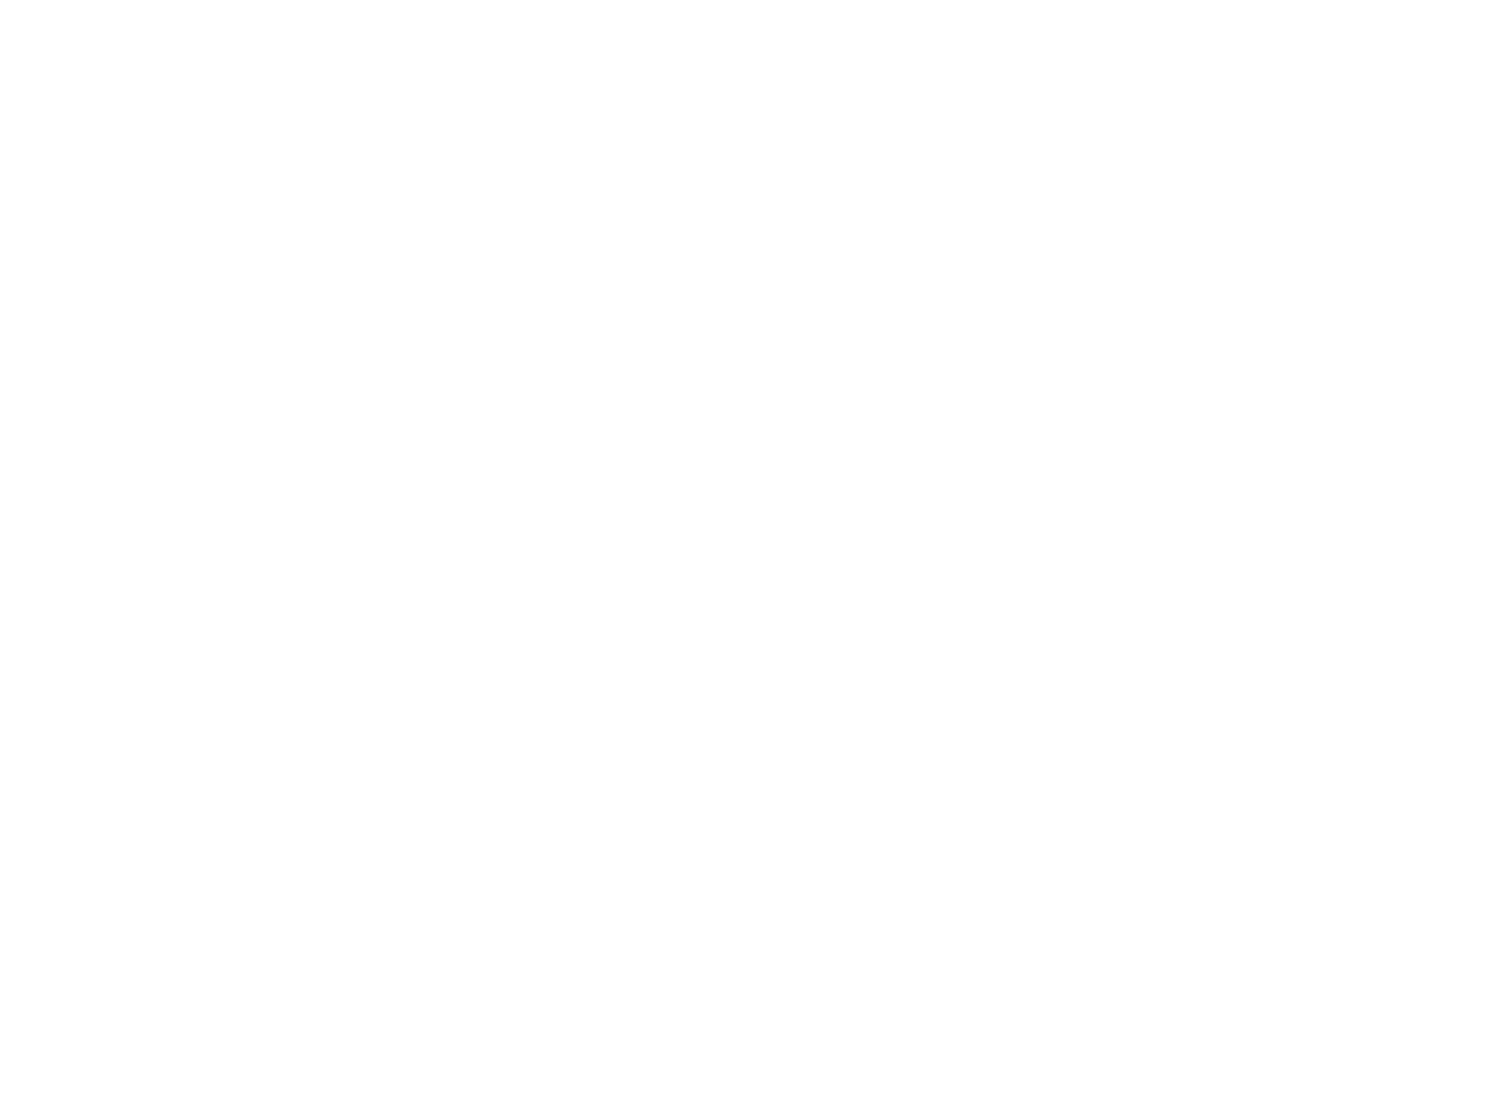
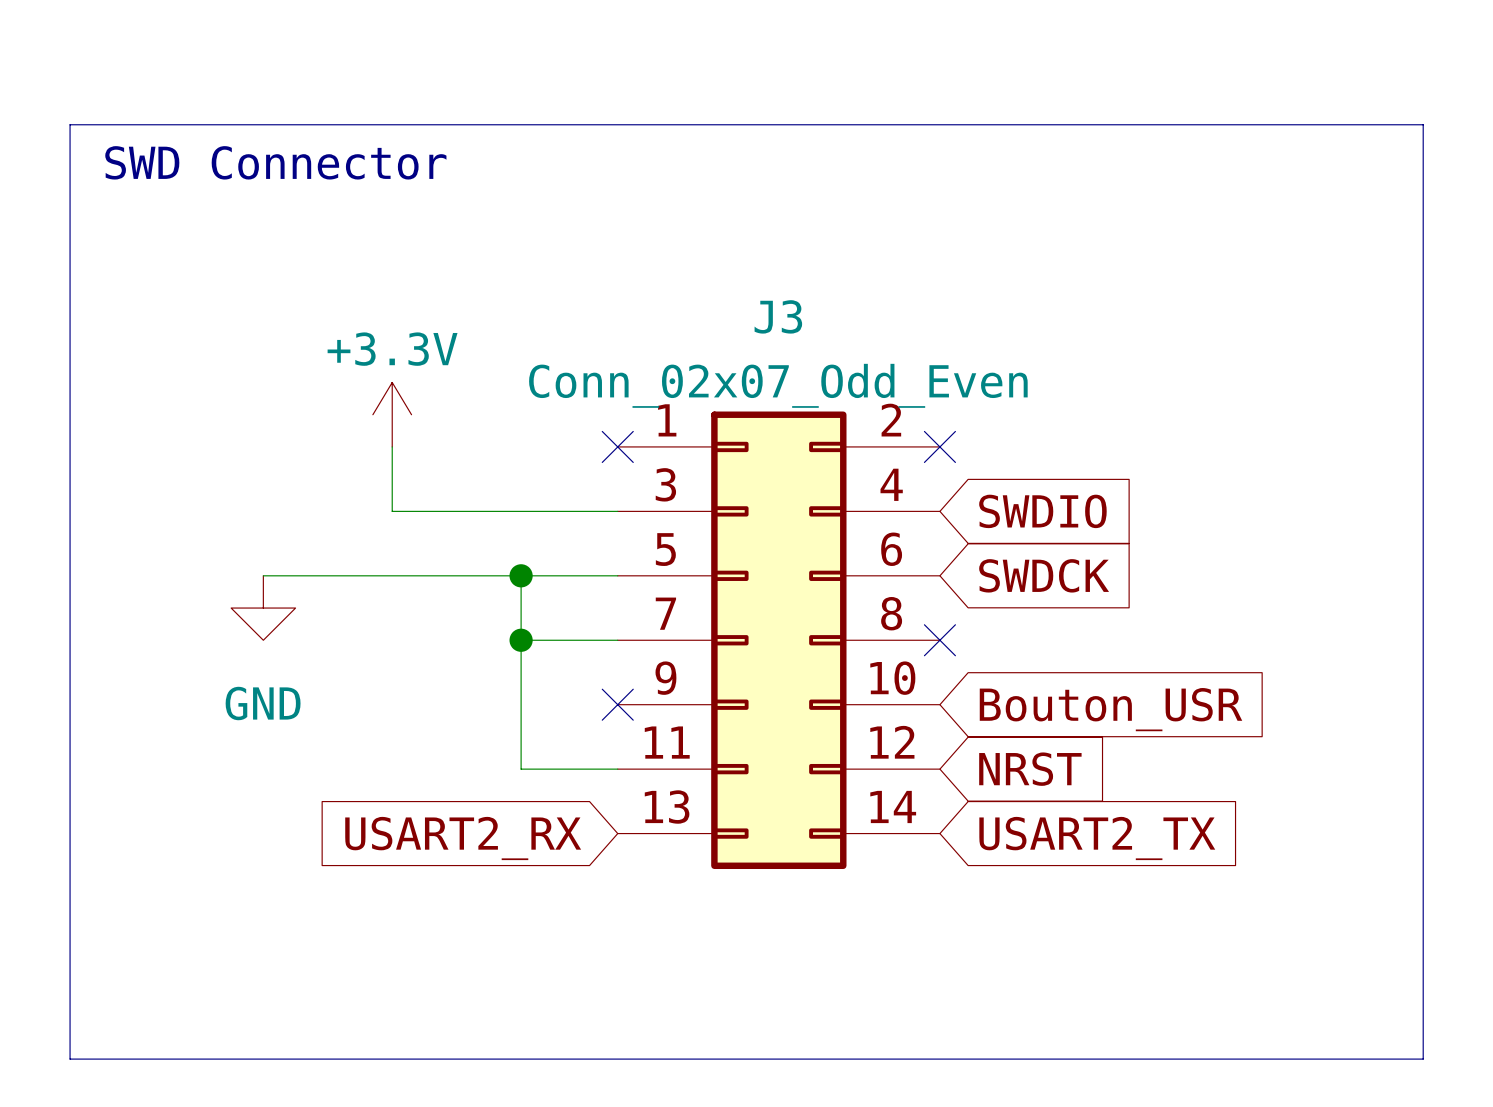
line: none -> (70, 124) (1423, 124) (1423, 1059) (70, 1059) (70, 124)
text: none -> SWD Connector (275, 162)
power symbol: none -> +3.3V (392, 414)
wire: none -> (392, 446) (392, 511) (617, 511)
no-connect mark: none -> (617, 446)
no-connect mark: none -> (939, 446)
global label: none -> SWDIO (1042, 511)
wire: none -> (263, 575) (617, 575)
wire: none -> (521, 575) (521, 769) (617, 769)
junction: none -> (521, 575)
global label: none -> SWDCK (1044, 575)
power symbol: none -> GND (263, 608)
wire: none -> (521, 640) (617, 640)
junction: none -> (521, 640)
J3: none -> Conn_02x07_Odd_Even (778, 640)
no-connect mark: none -> (939, 640)
no-connect mark: none -> (617, 704)
global label: none -> Bouton_USR (1111, 709)
global label: none -> NRST (1030, 769)
global label: none -> USART2_RX (463, 838)
global label: none -> USART2_TX (1097, 838)

